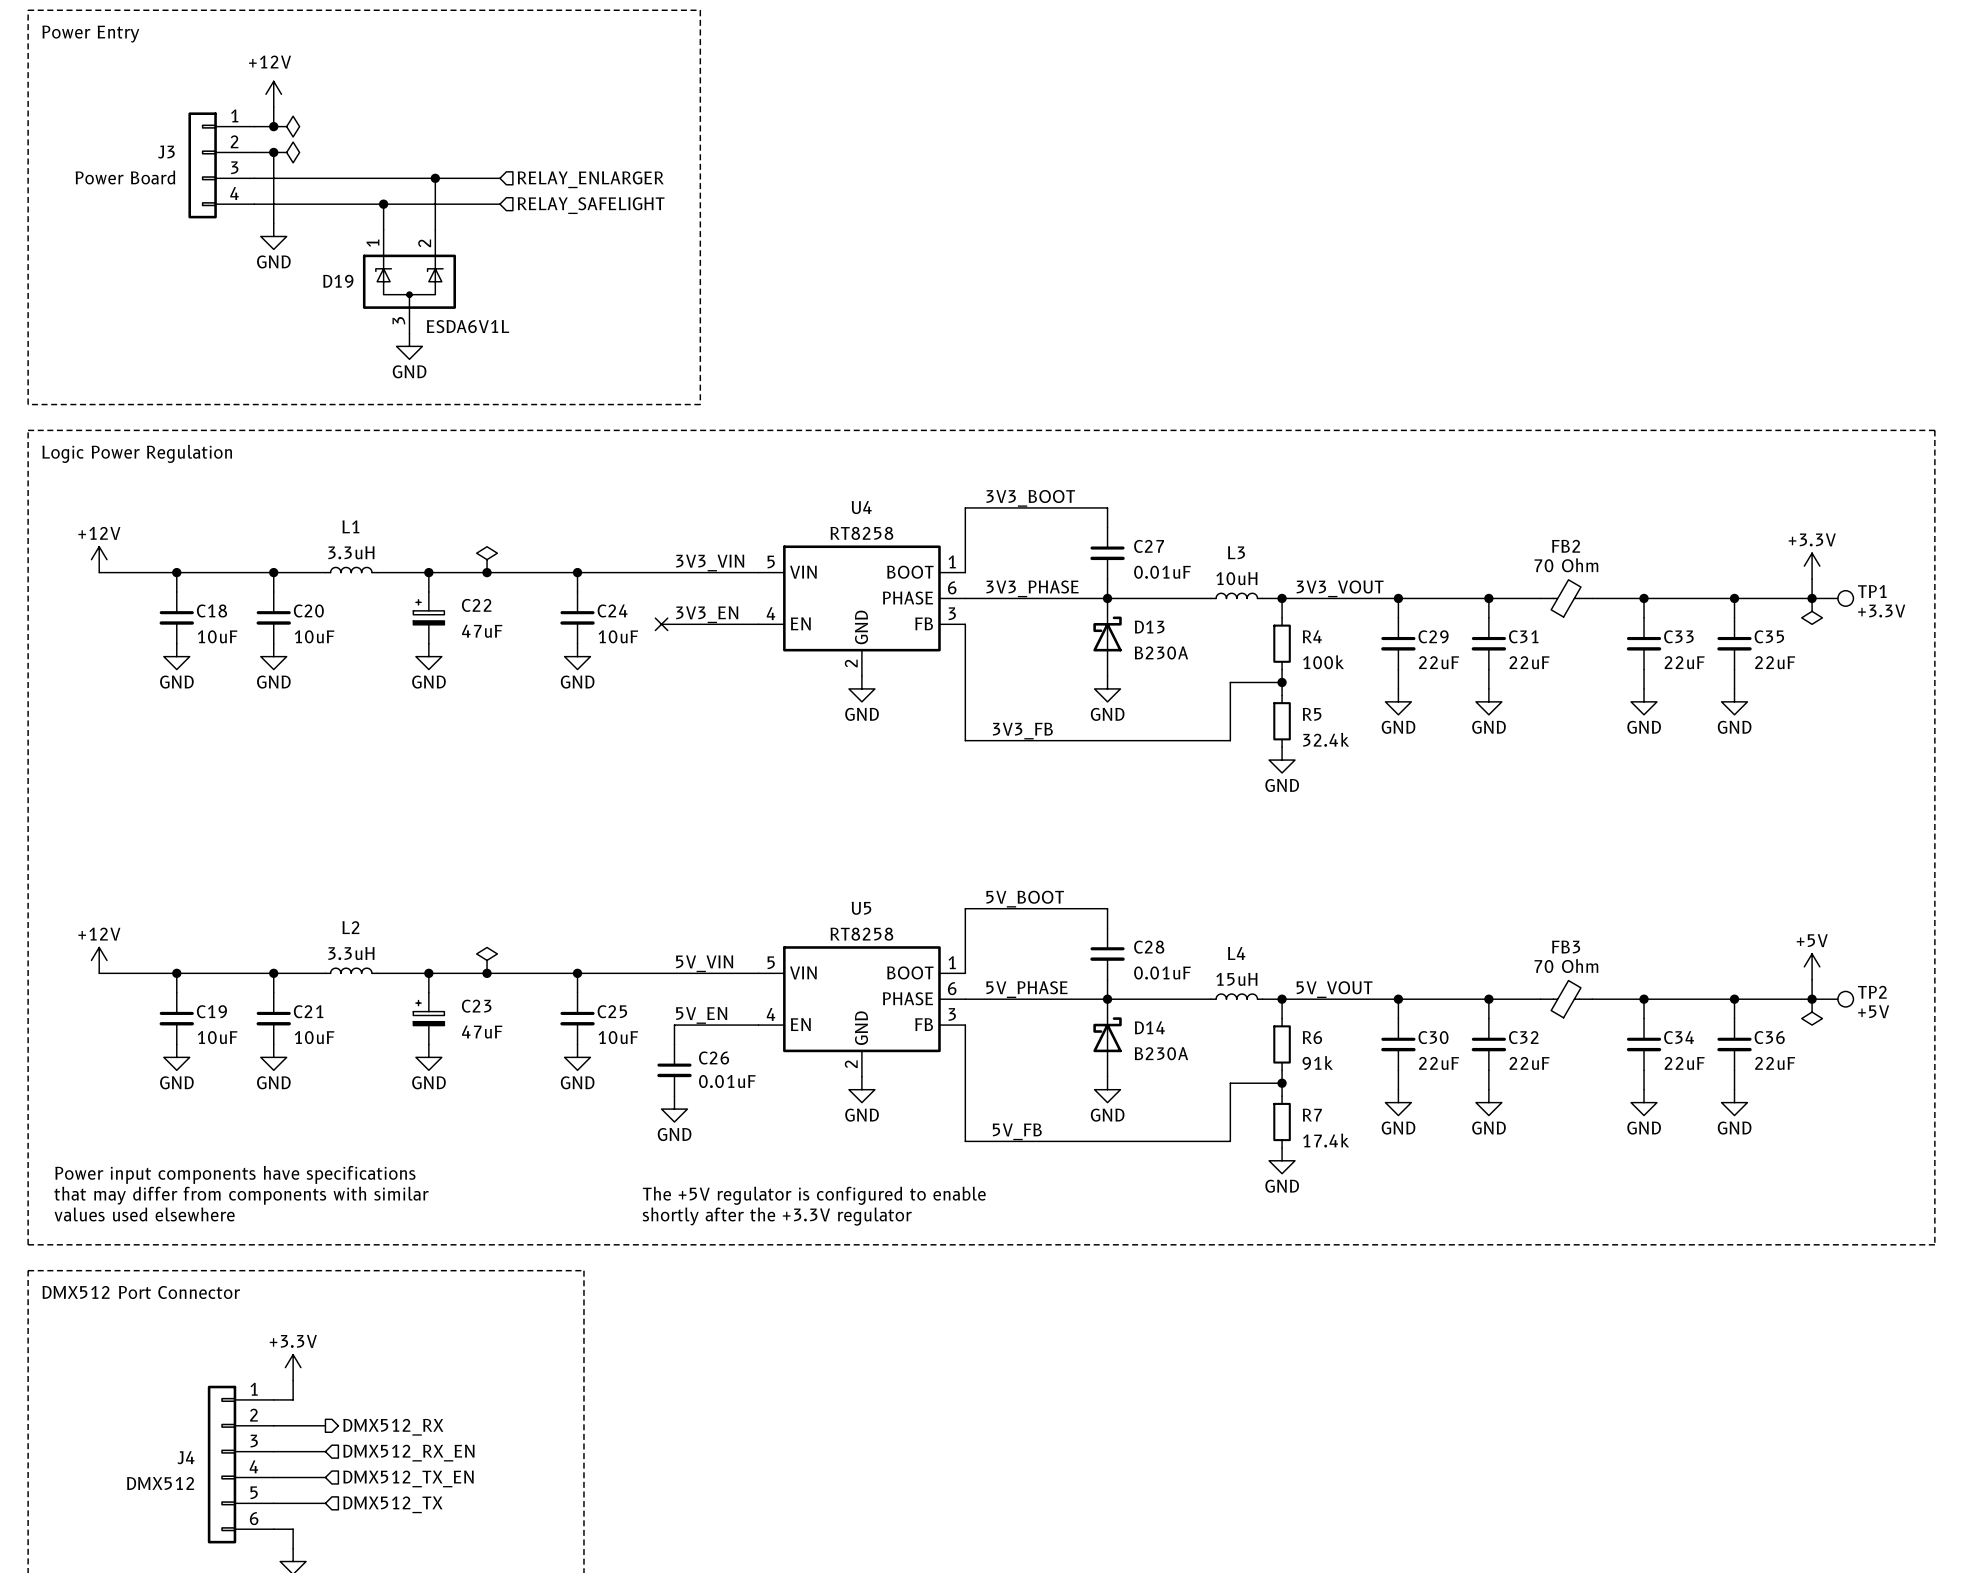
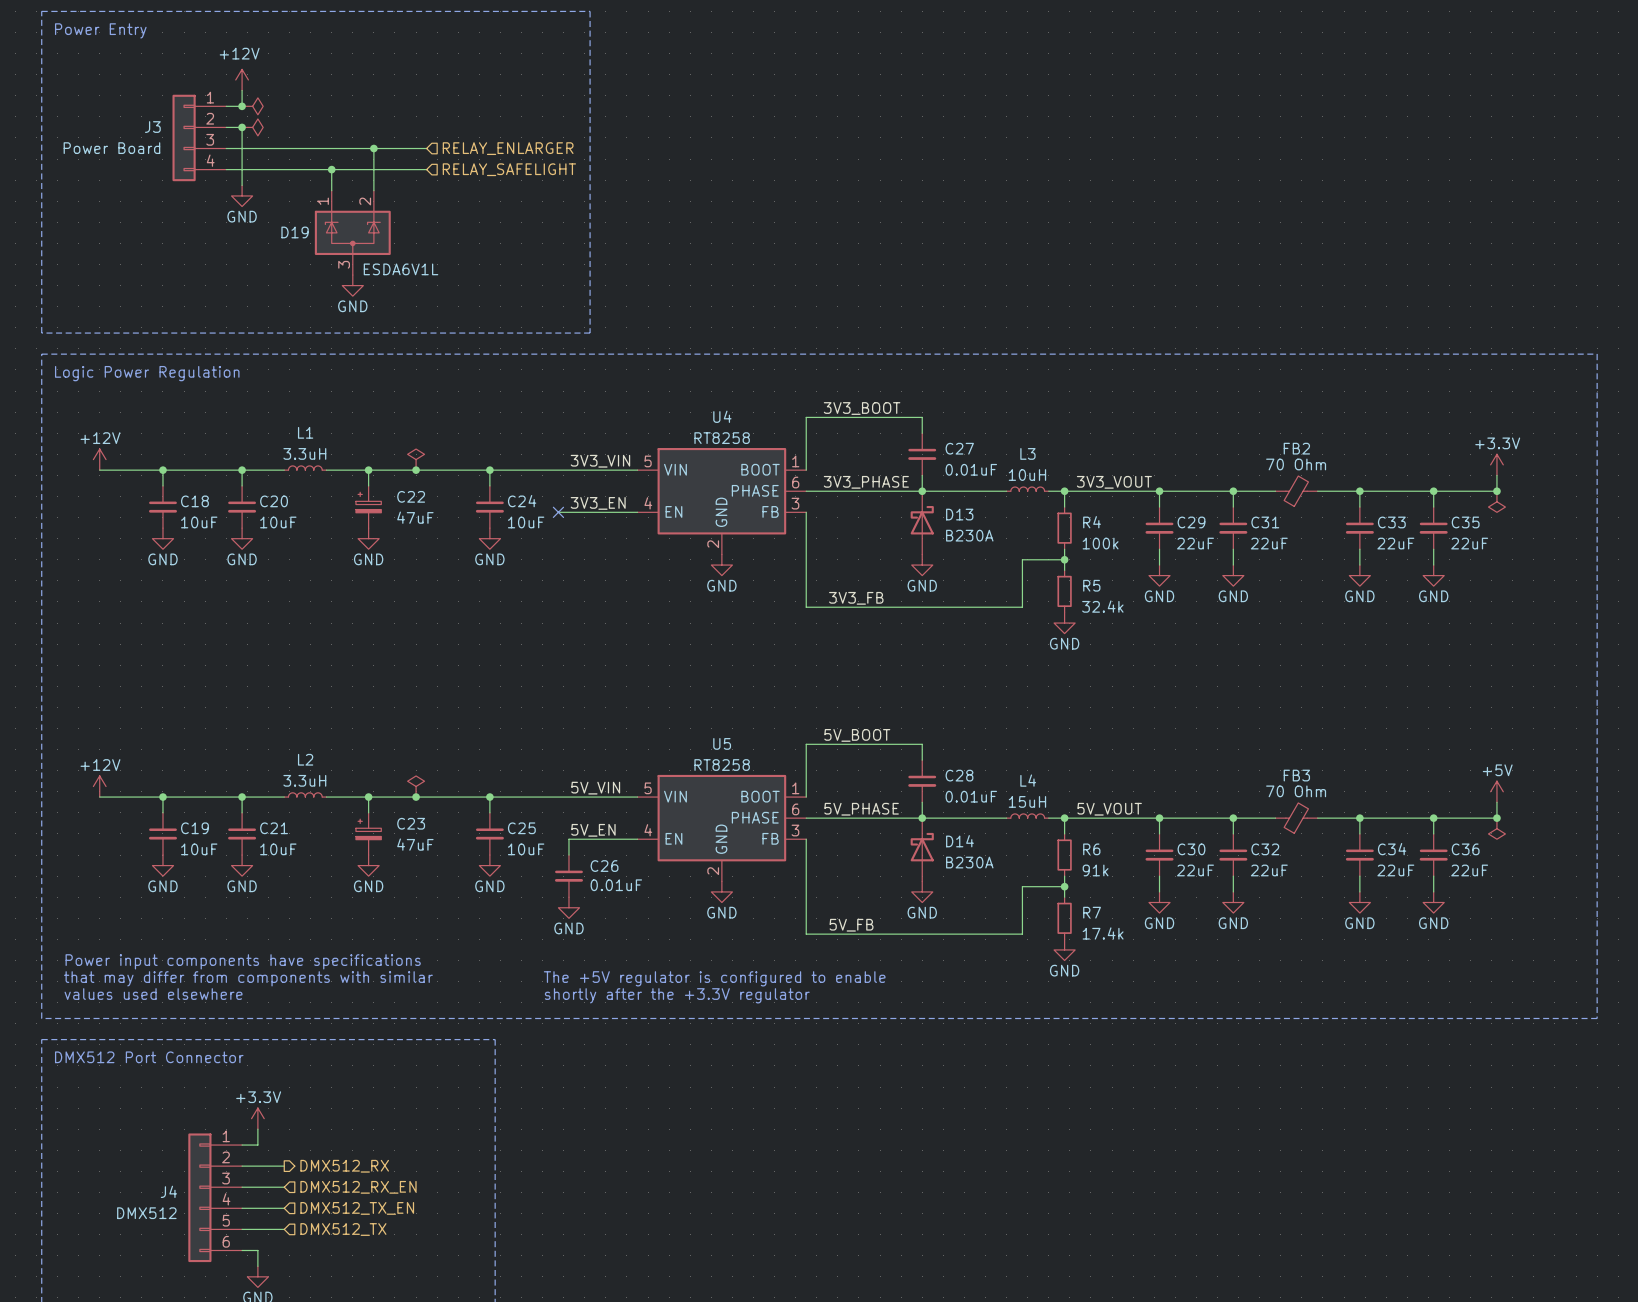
TP1: +3.3V (1832, 598) -> none
TP2: +5V (1832, 999) -> none

